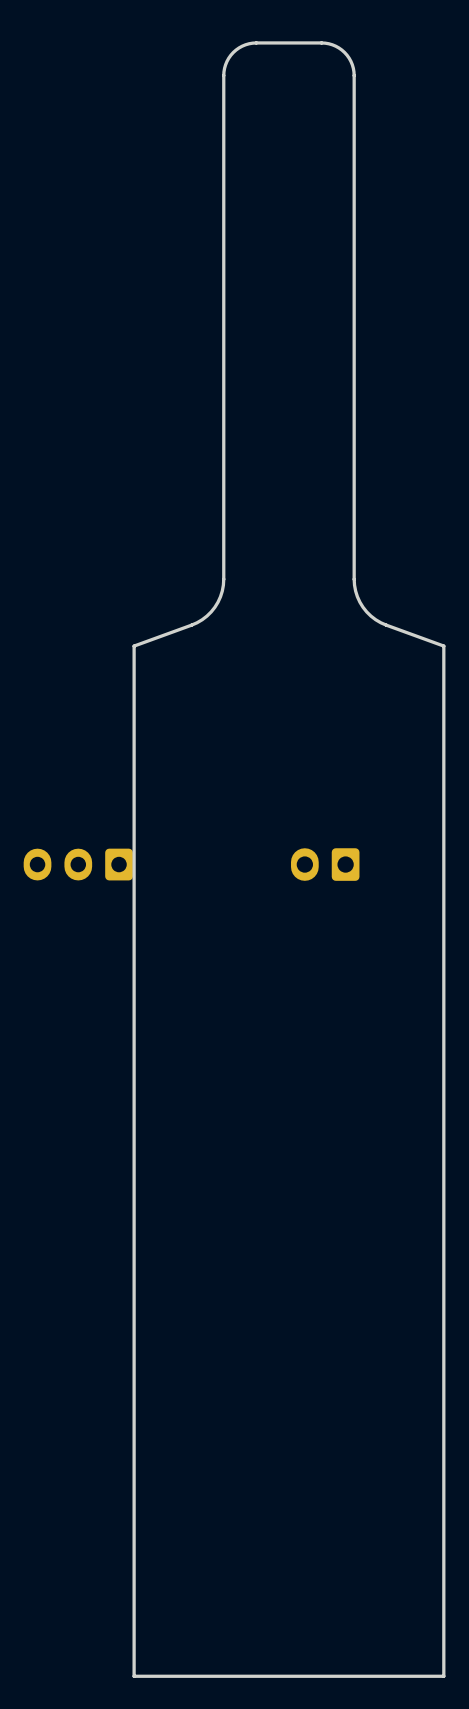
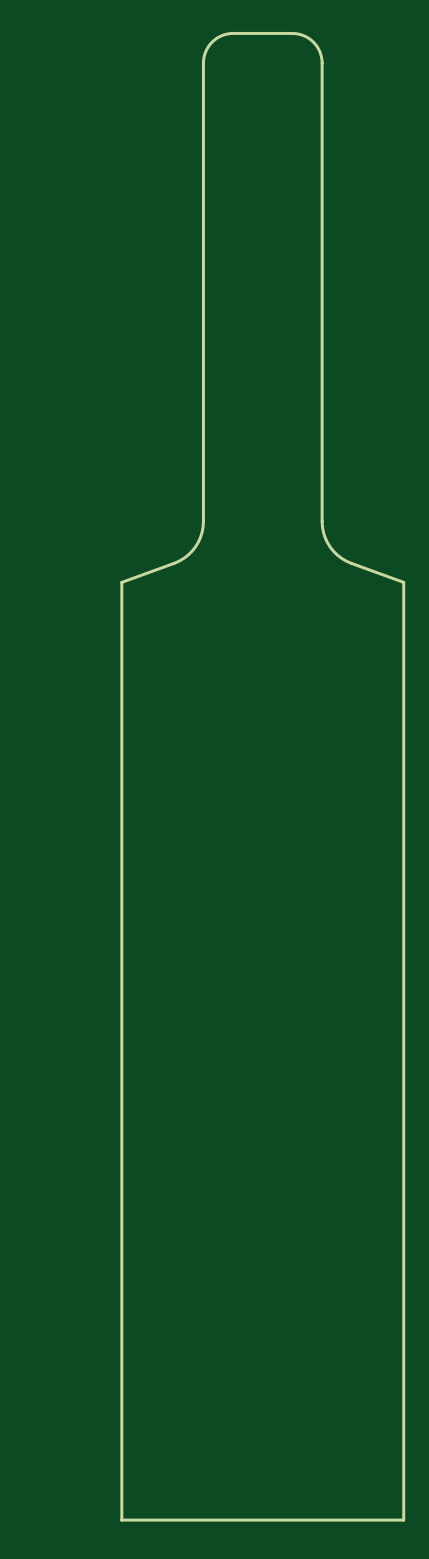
part: (78, 864) -> none
part: (325, 864) -> none

